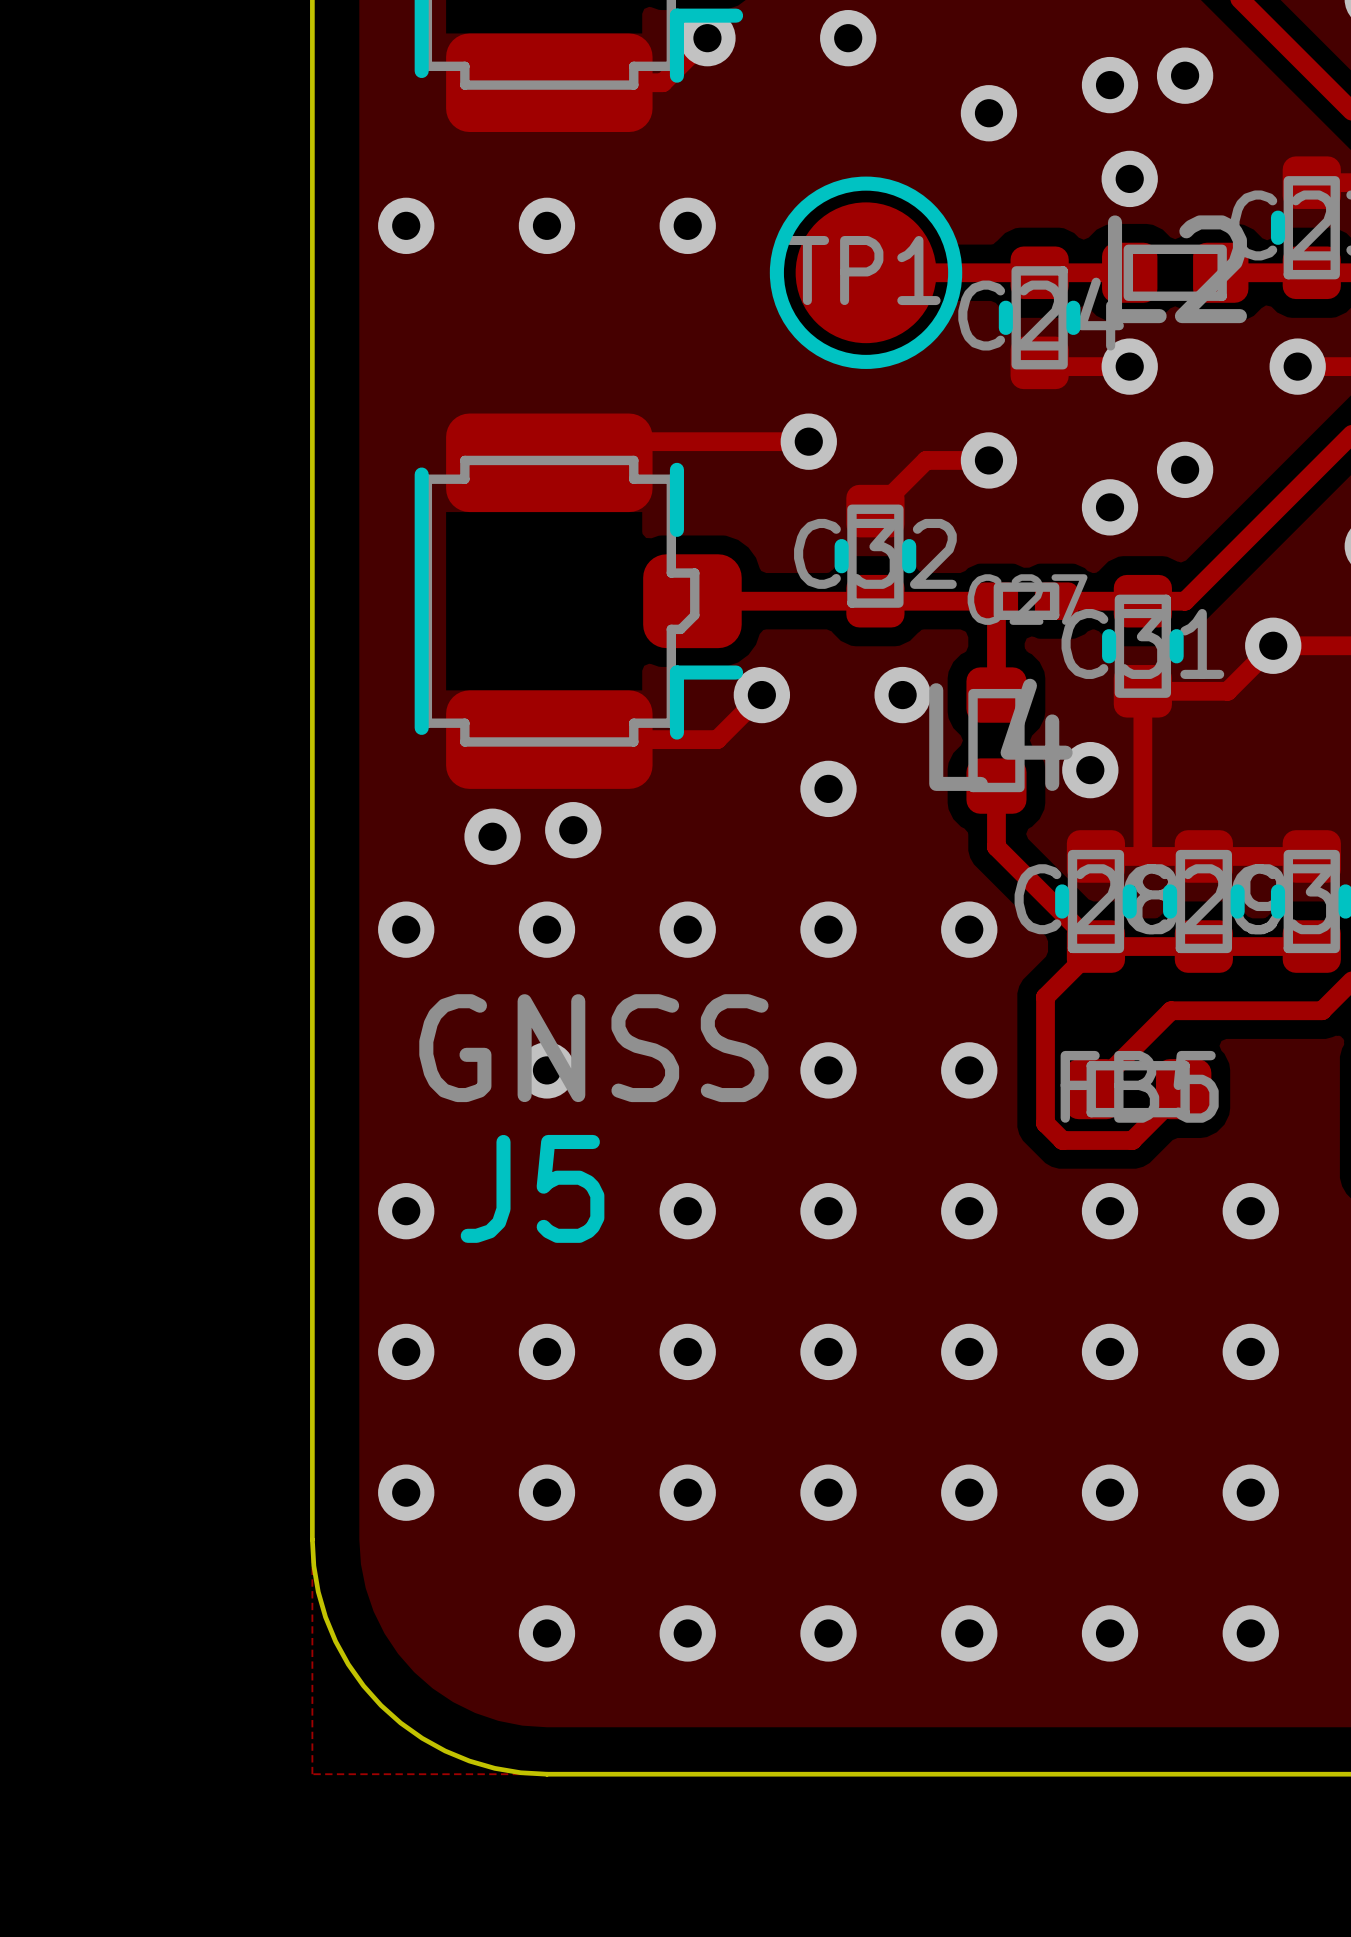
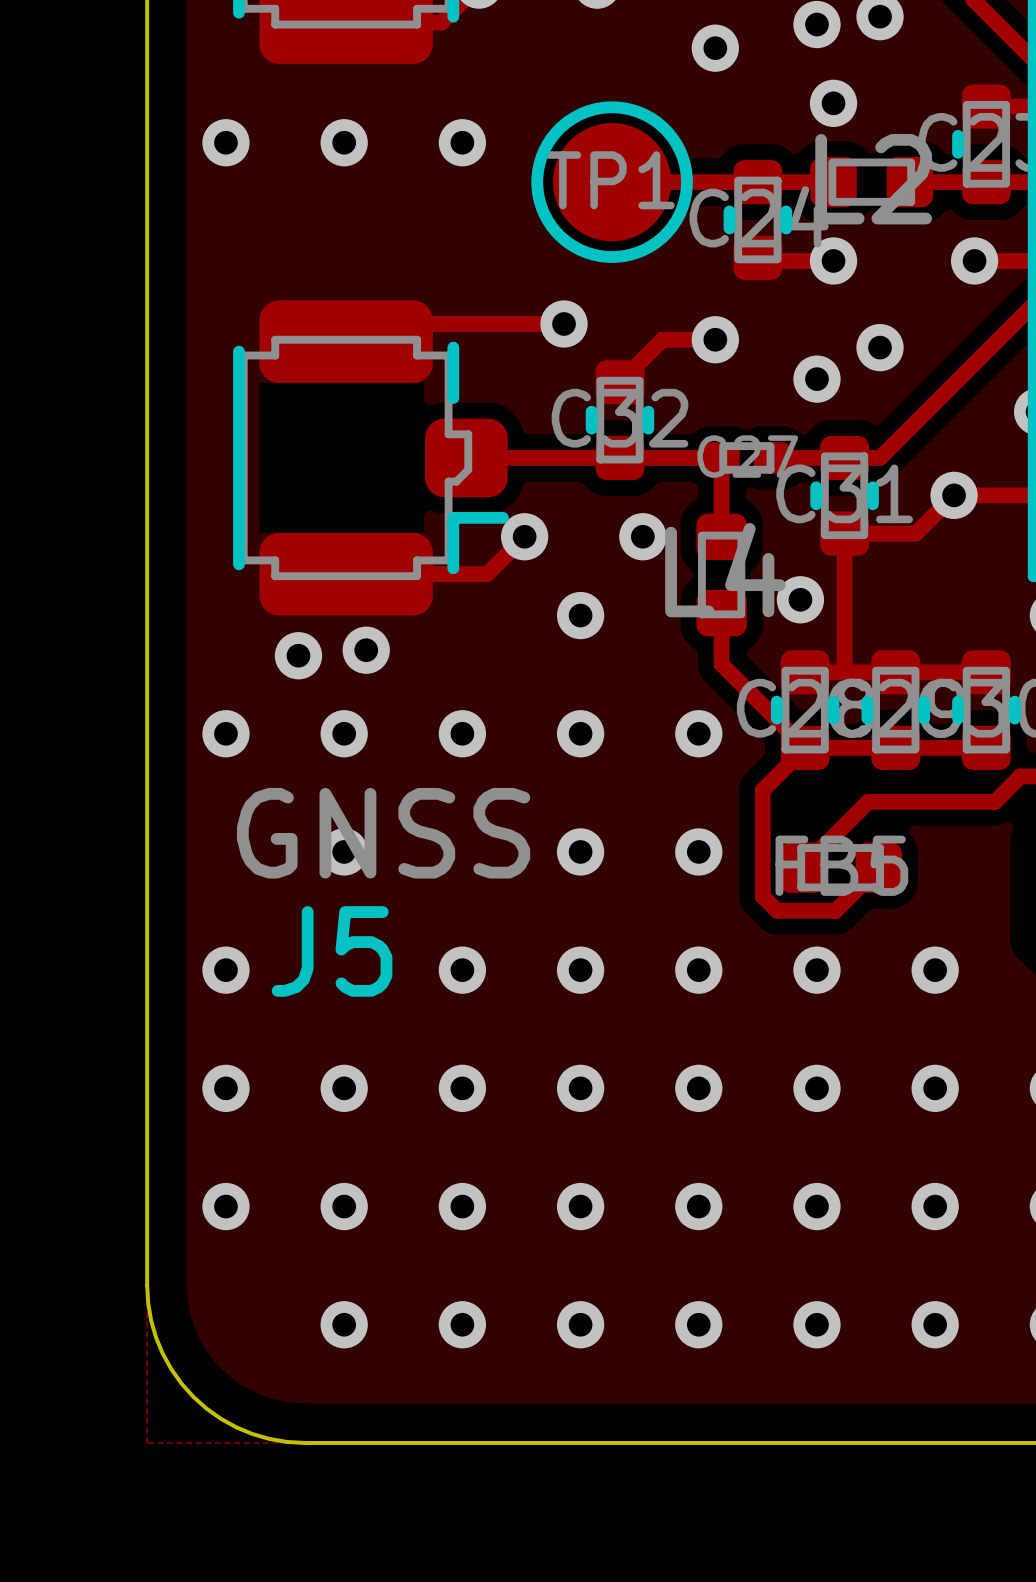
board edge: (312, 1539) (318, 1591) (335, 1641) (363, 1685) (381, 1705) (400, 1723) (445, 1750) (494, 1768) (546, 1774) -> (147, 1245) (148, 1303) (156, 1337) (171, 1369) (193, 1396) (220, 1418) (252, 1434) (287, 1441) (344, 1442)

